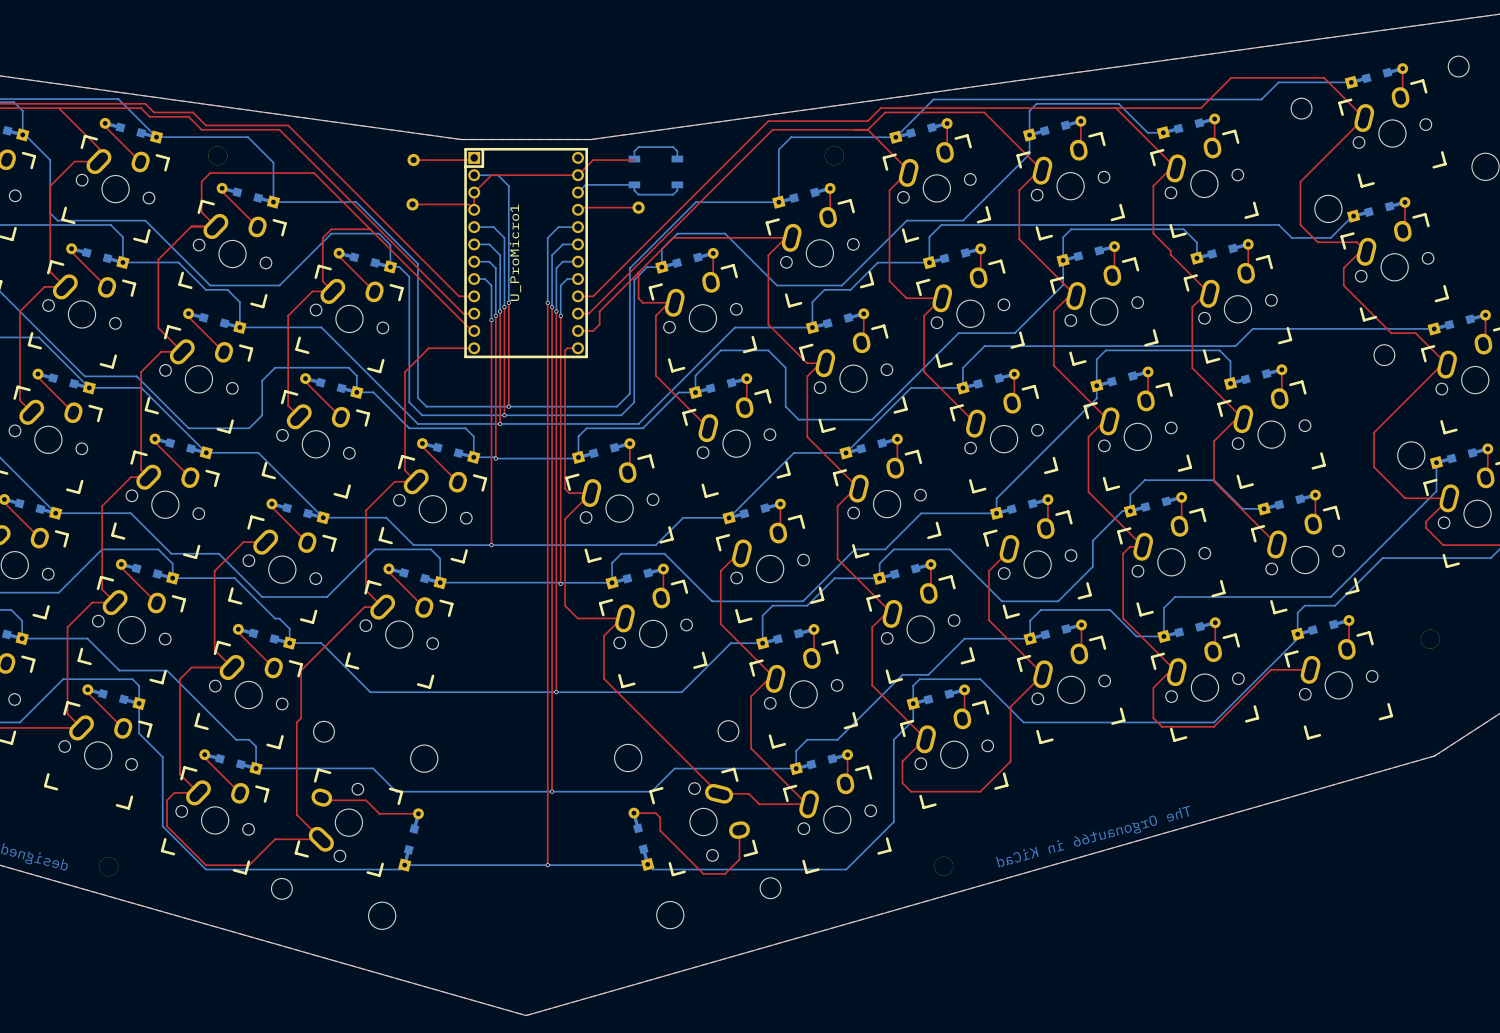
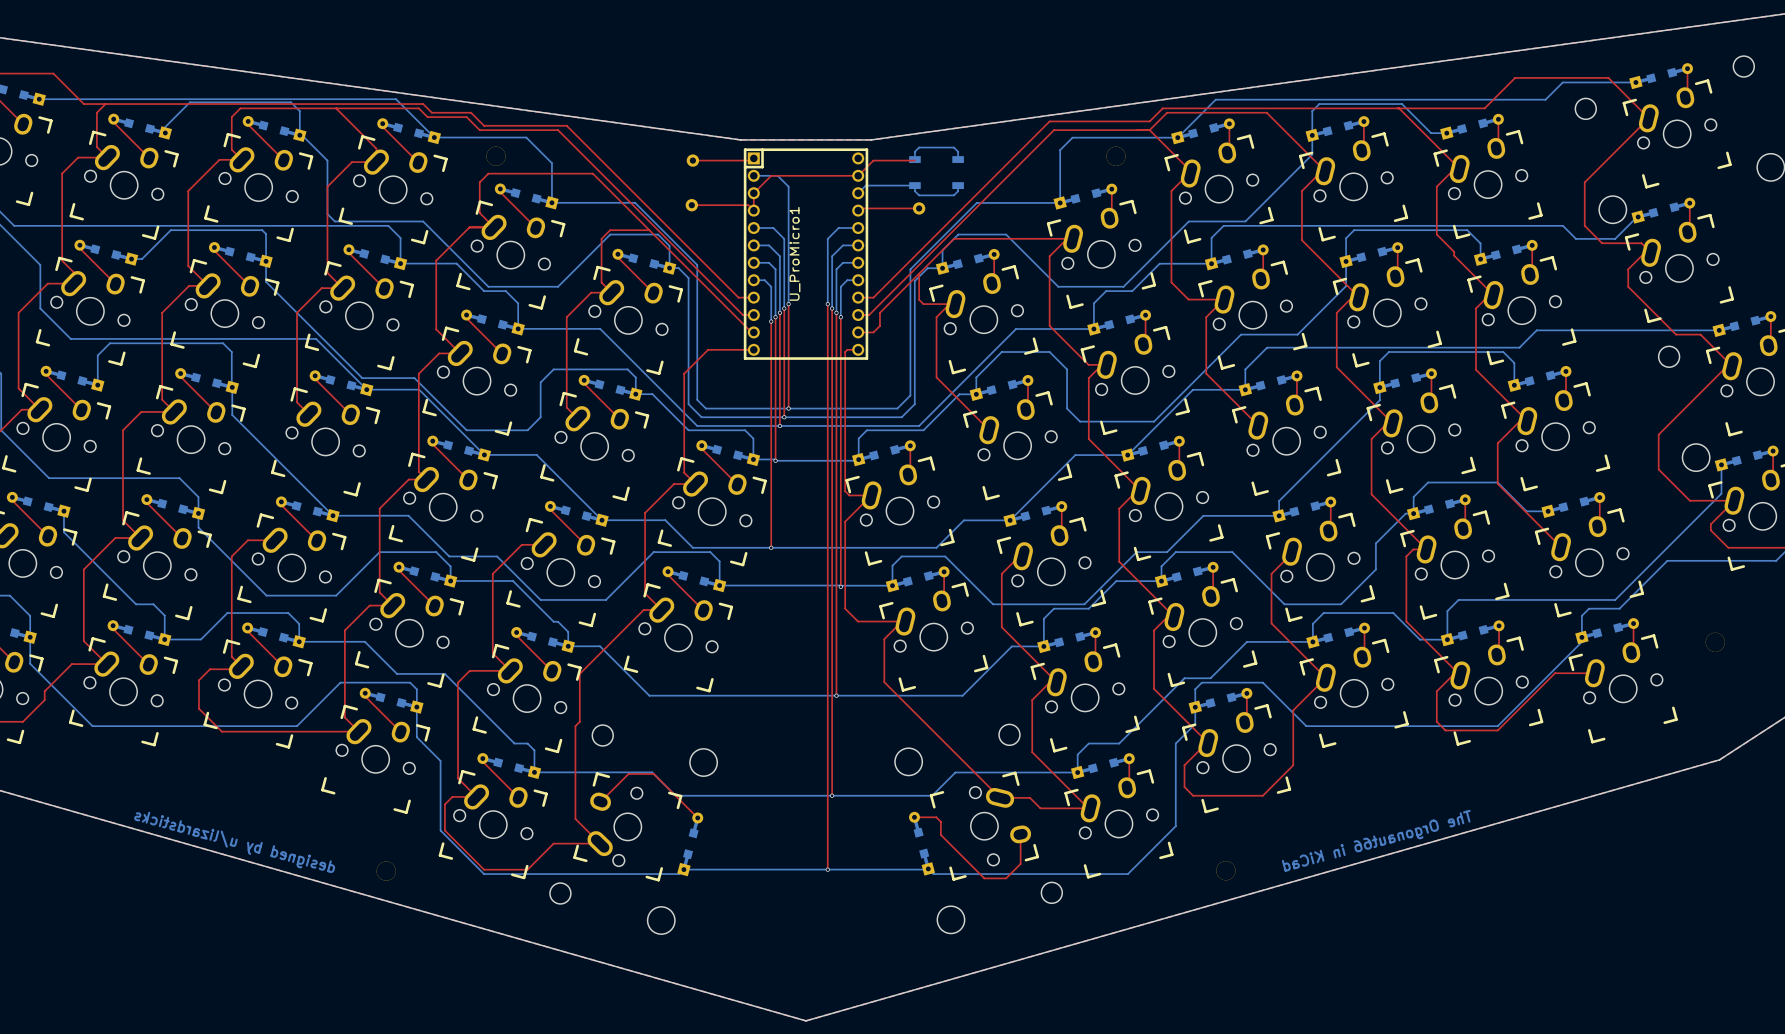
top track: (324, 800) (366, 800) (379, 813) (418, 813) -> (600, 801) (628, 773) (653, 773) (697, 817)

